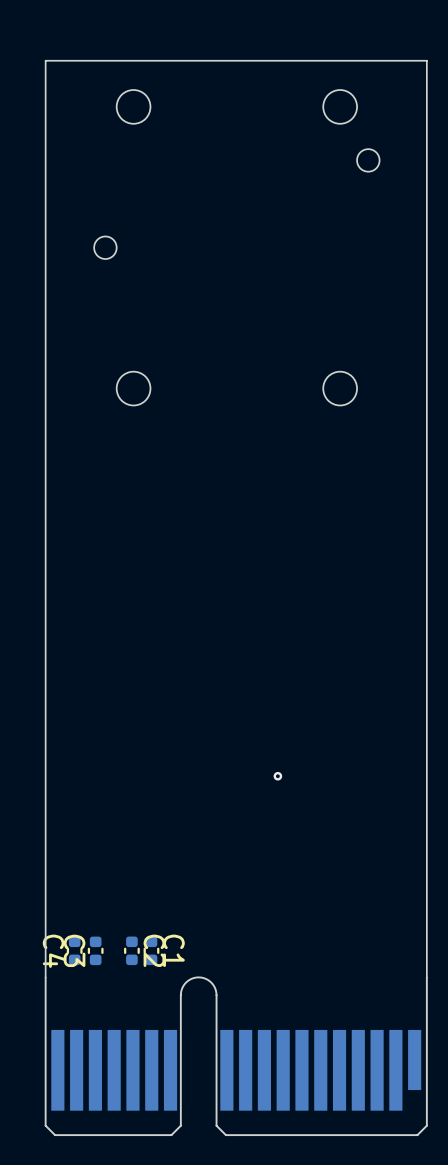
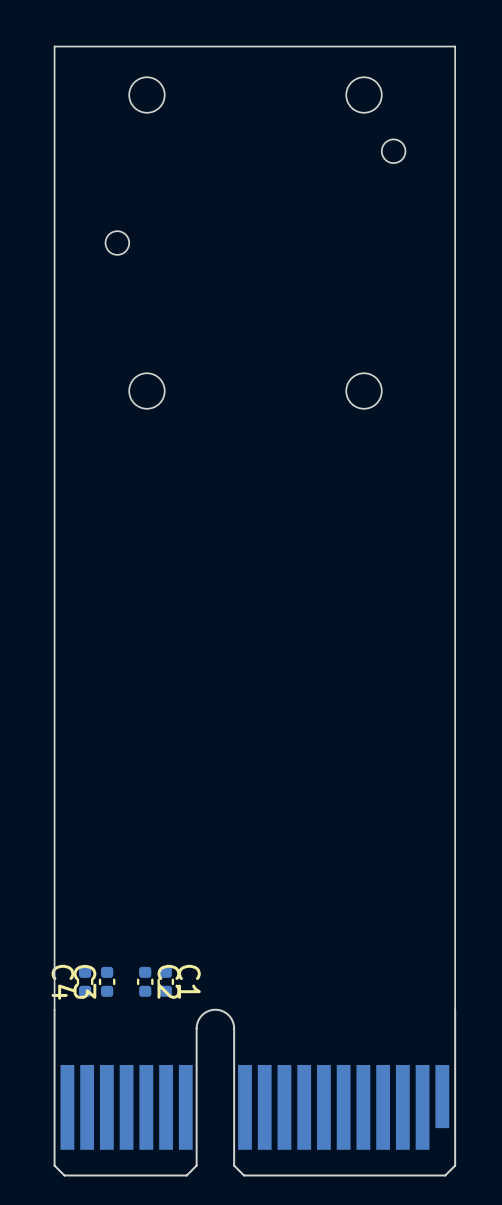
via: (277, 776) -> none

